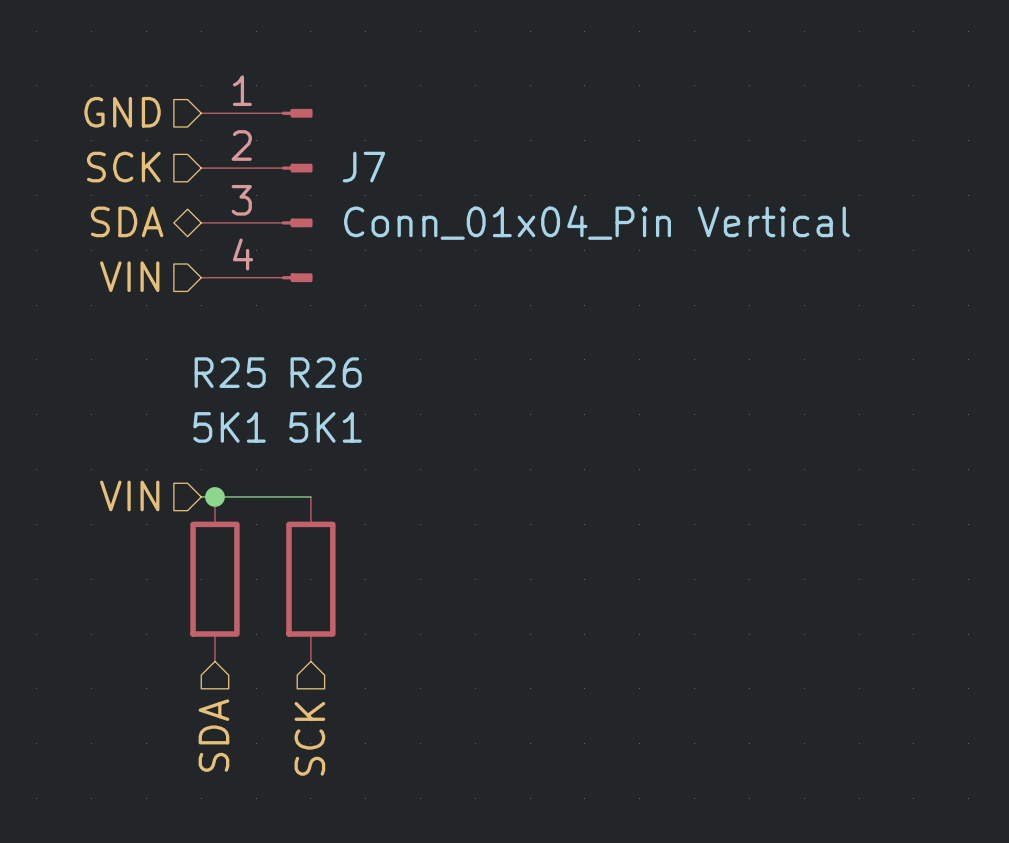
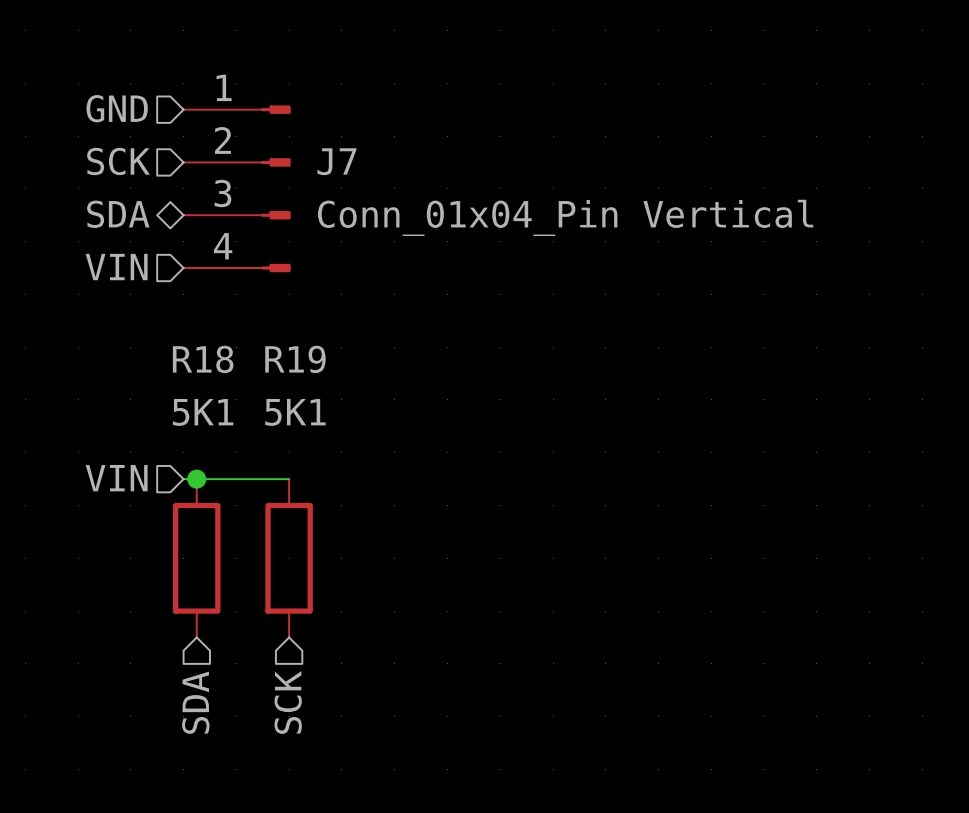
R25 name: R25 (230, 372) -> R18 (203, 359)
R26 name: R26 (326, 372) -> R19 (295, 359)

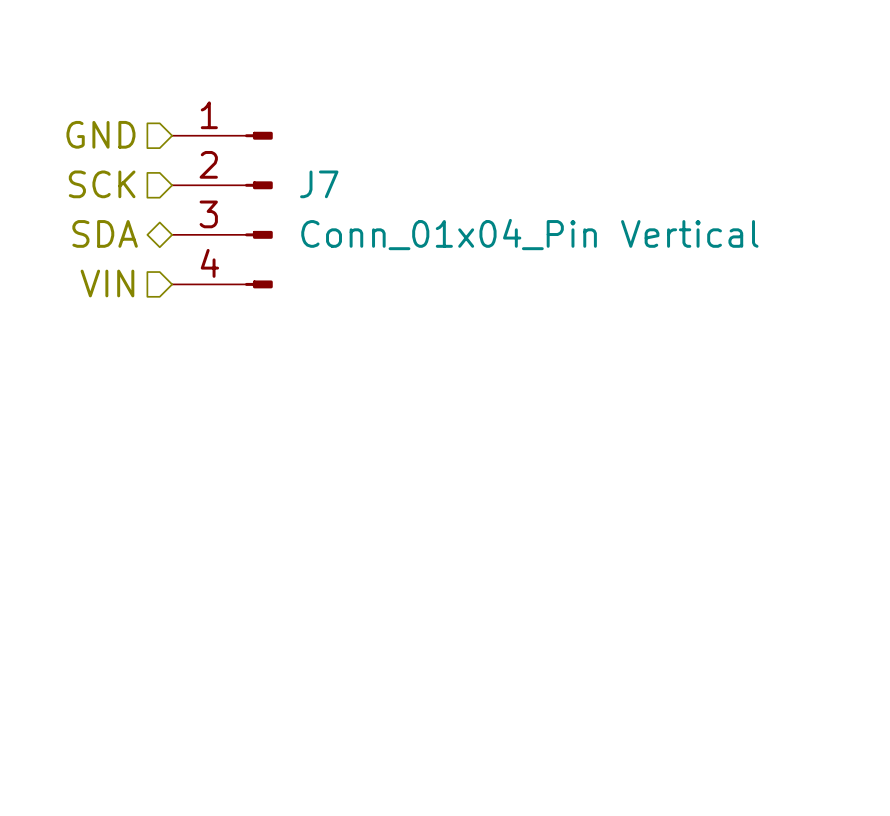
hierarchical label: VIN (116, 478) -> none
wire: (183, 479) (289, 479) -> none
junction: (196, 479) -> none
R18: 5K1 (196, 558) -> none
R19: 5K1 (289, 558) -> none
hierarchical label: SDA (195, 702) -> none
hierarchical label: SCK (288, 702) -> none

